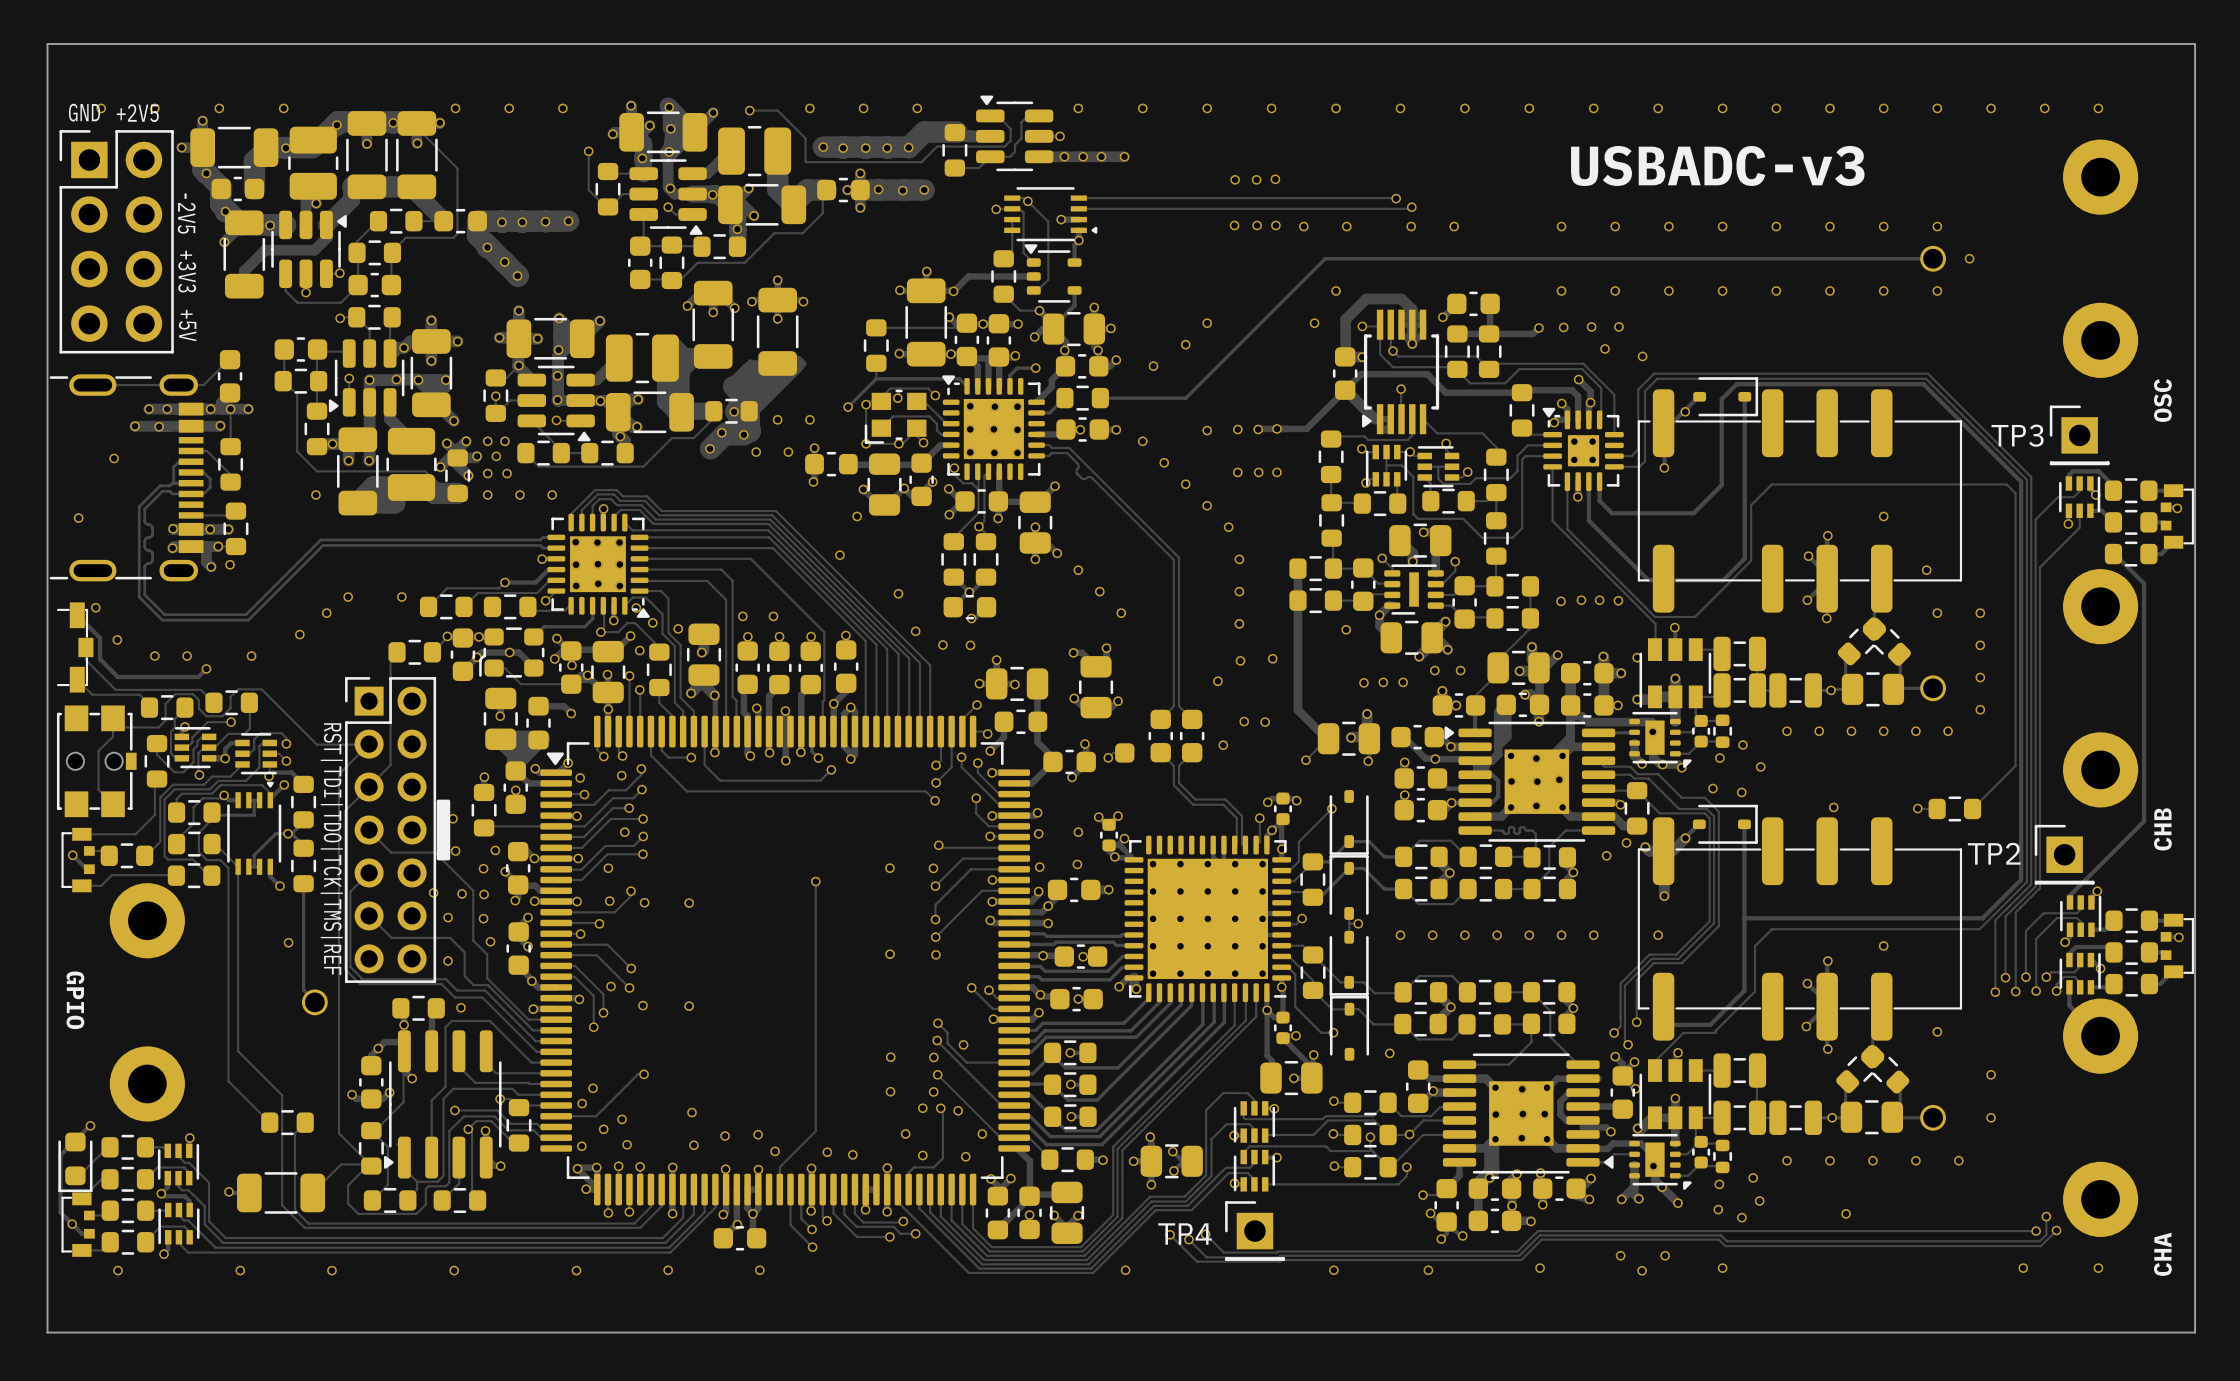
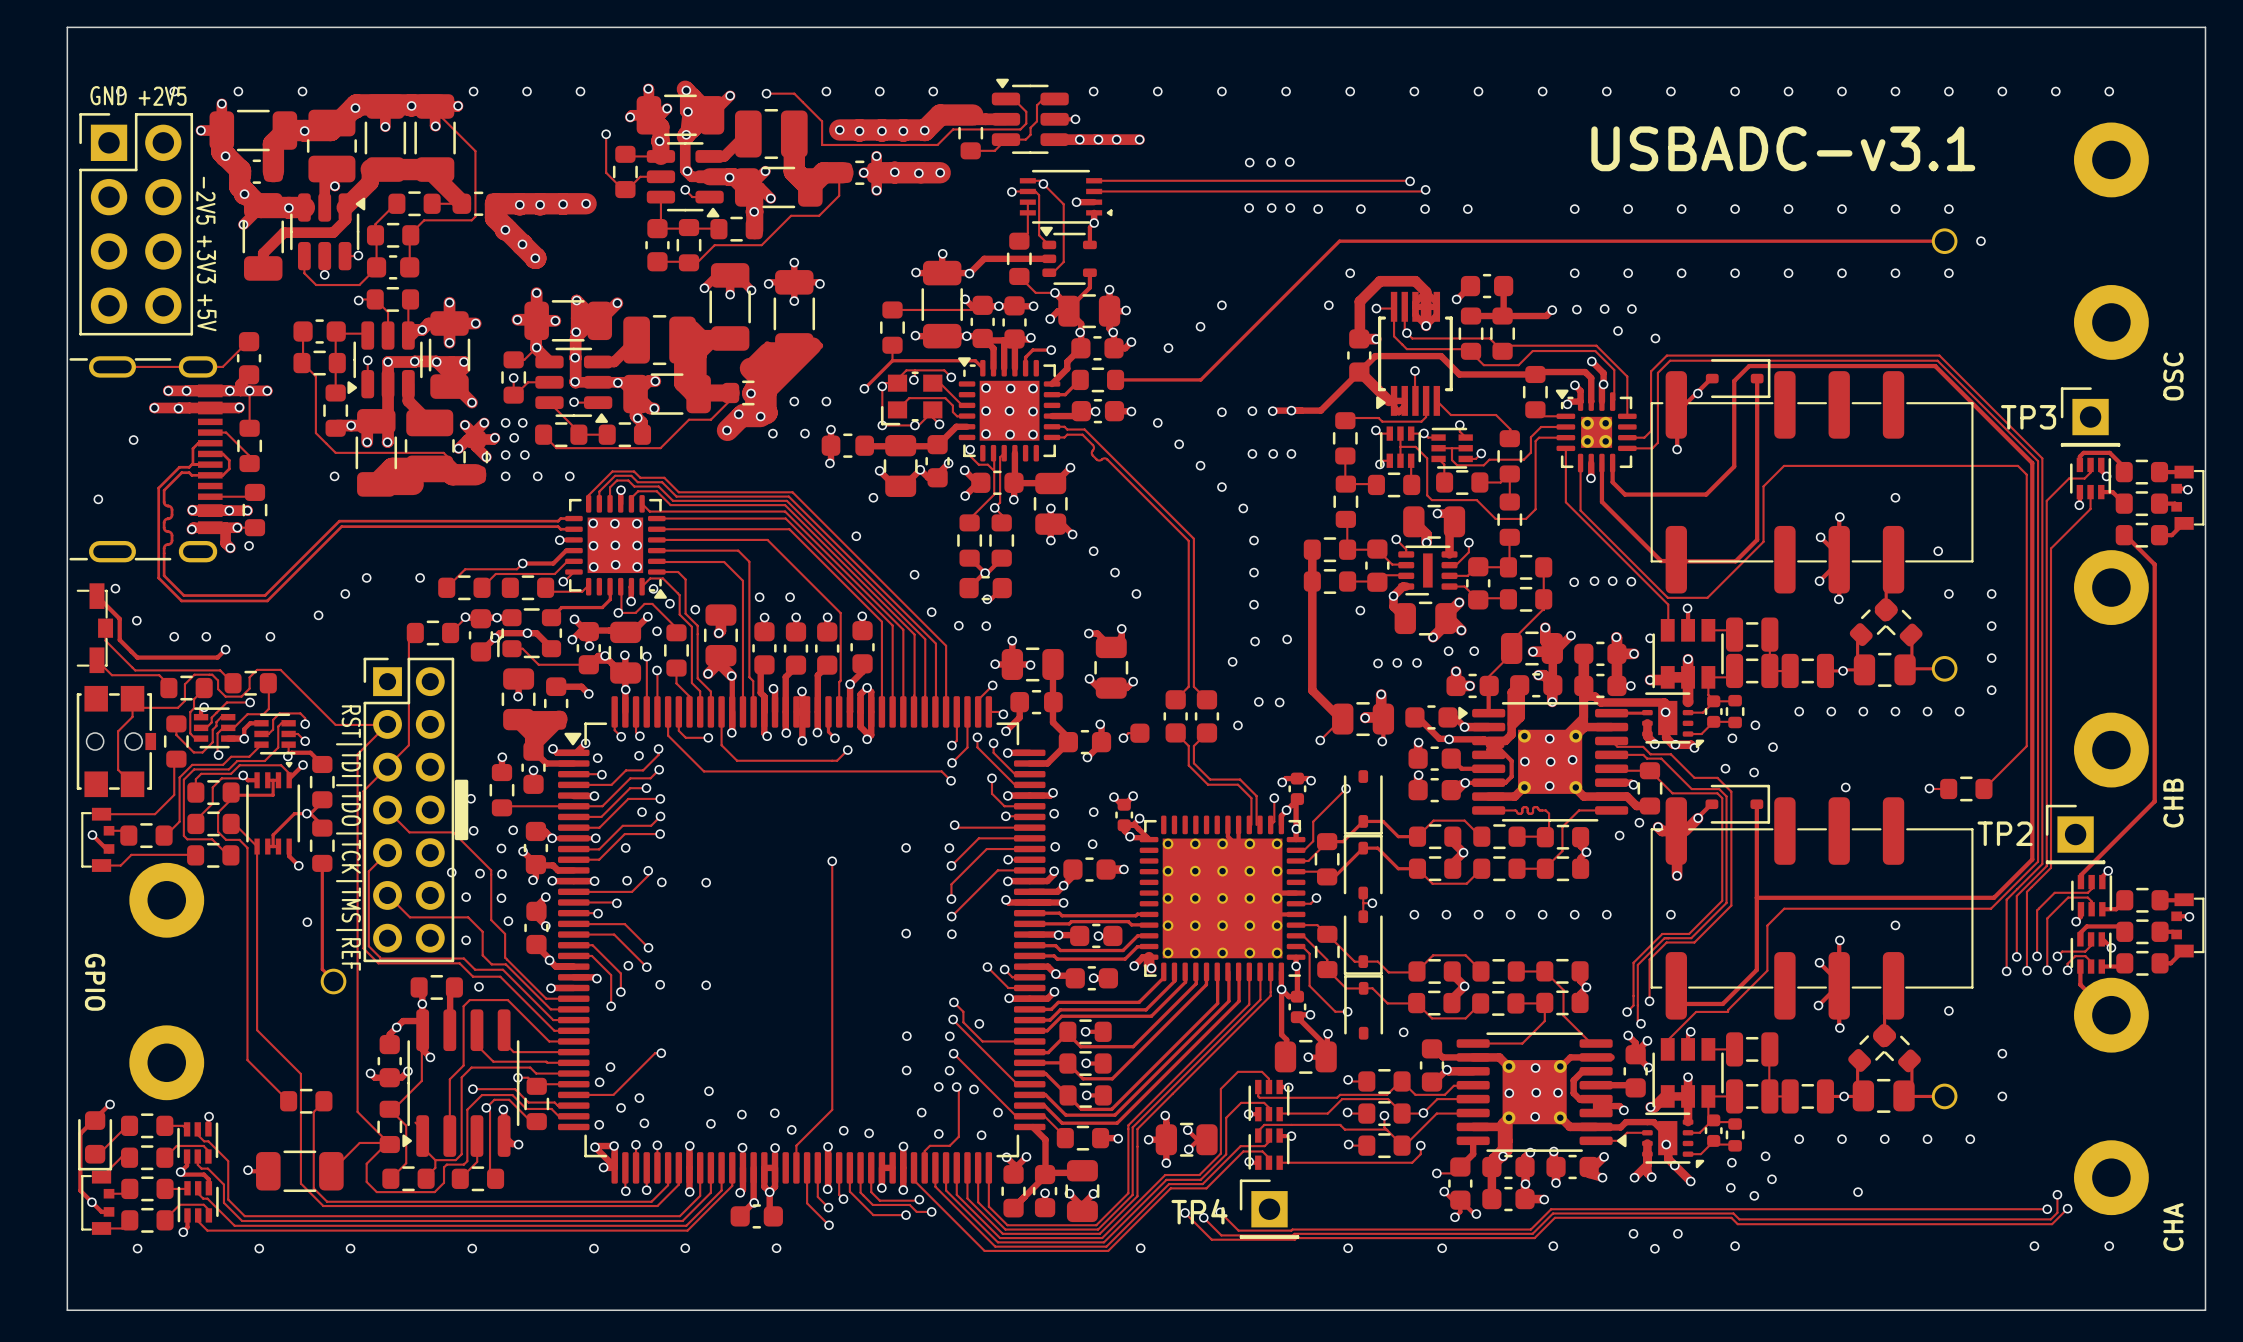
text: USBADC-v3 (1717, 165) -> USBADC-v3.1 (1783, 148)

